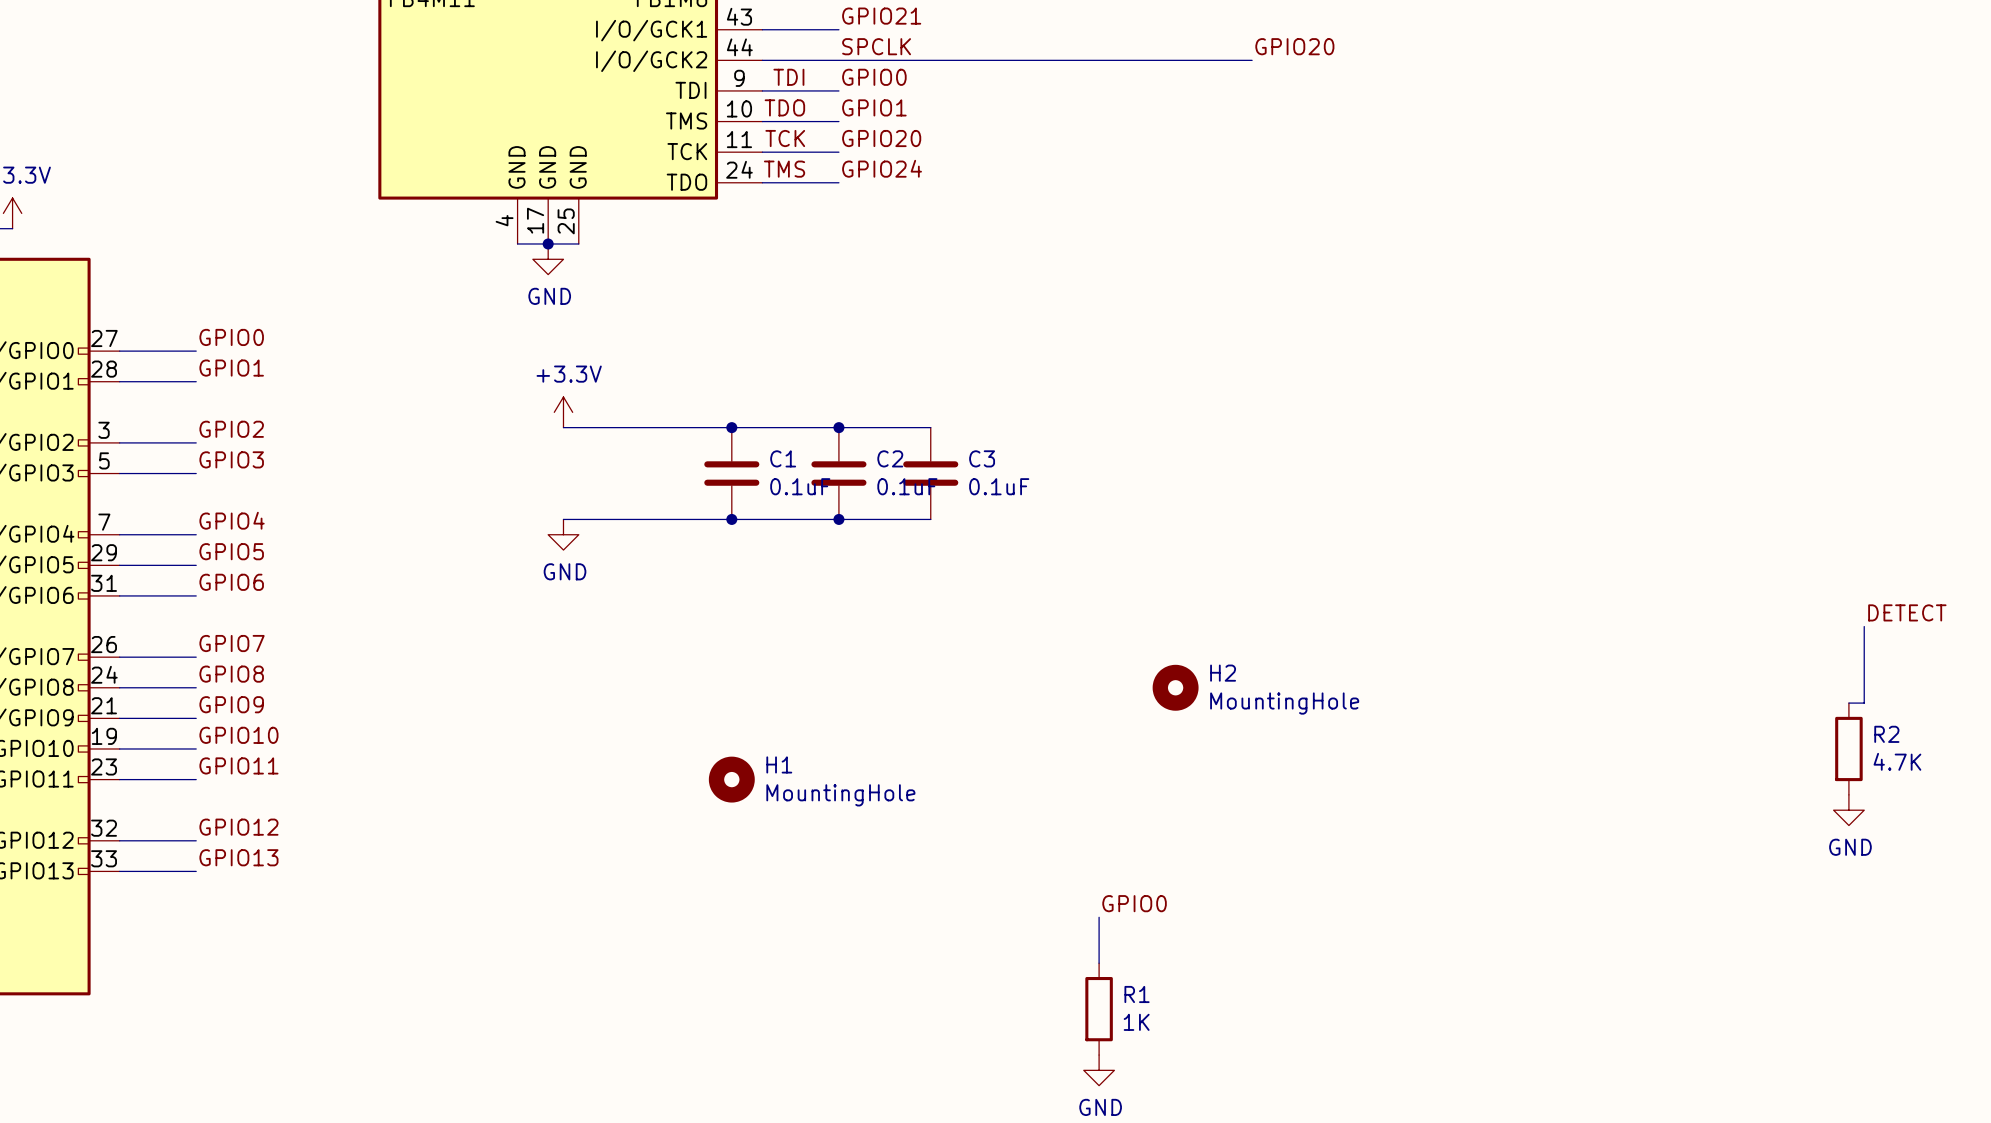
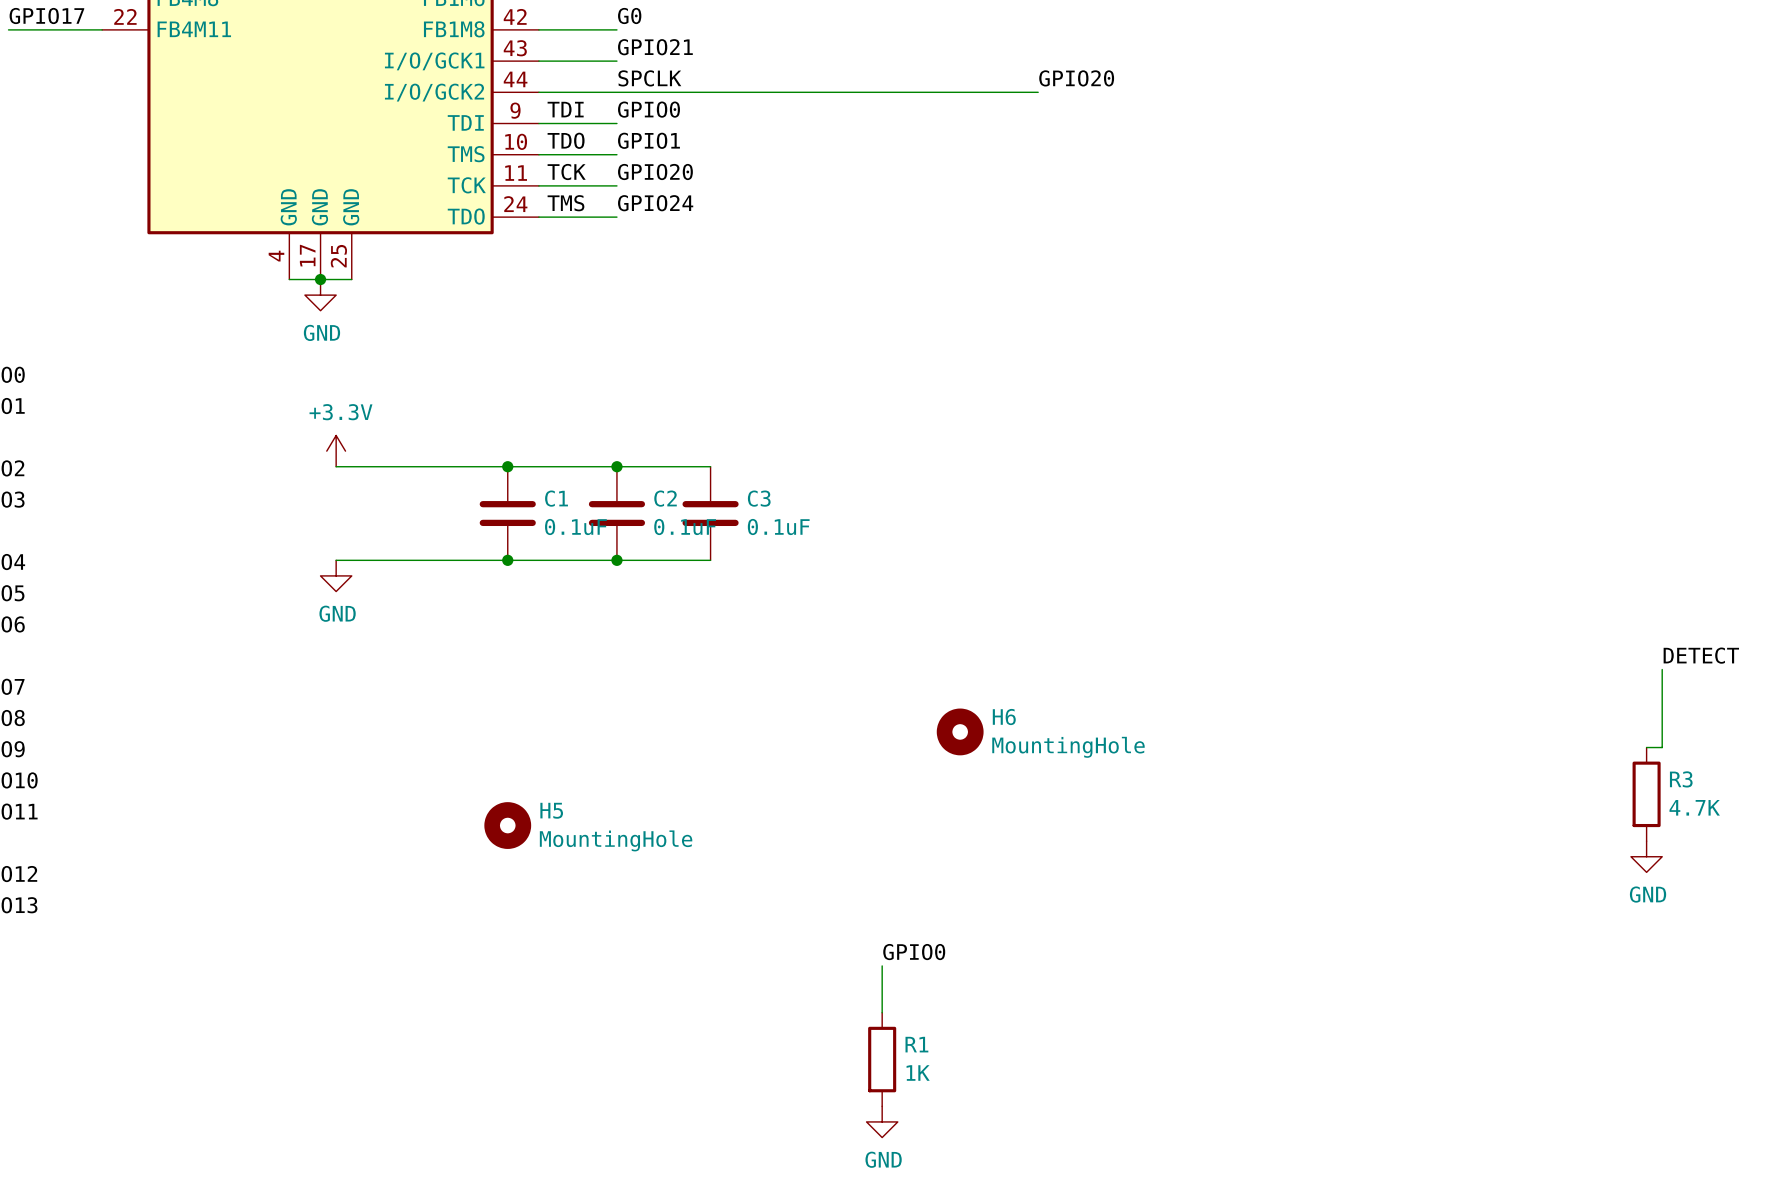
H2 name: H2 (1223, 673) -> H6 (1004, 717)
R2 name: R2 (1886, 734) -> R3 (1681, 779)
H1 name: H1 (779, 764) -> H5 (551, 810)

